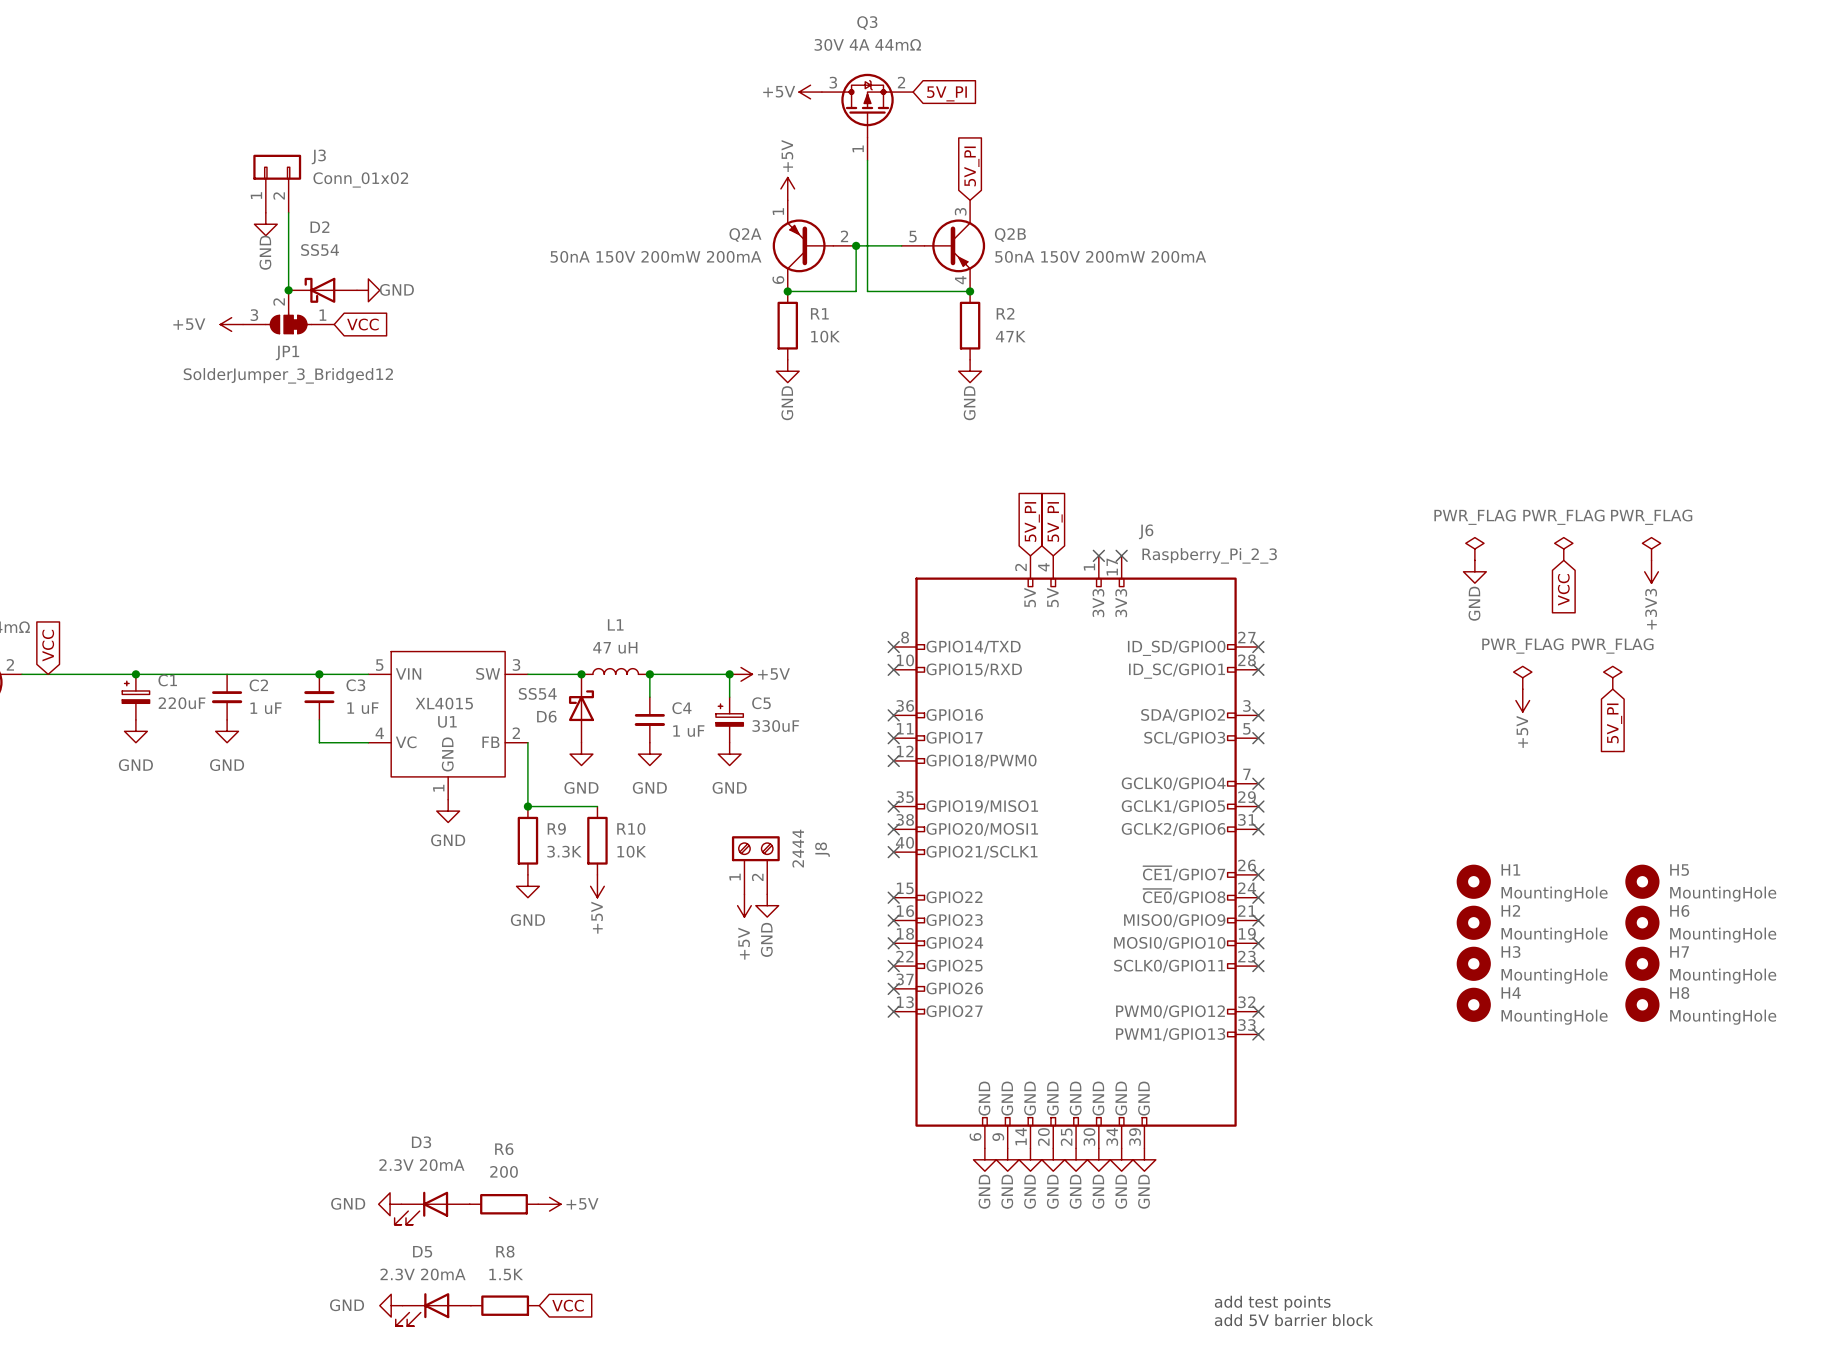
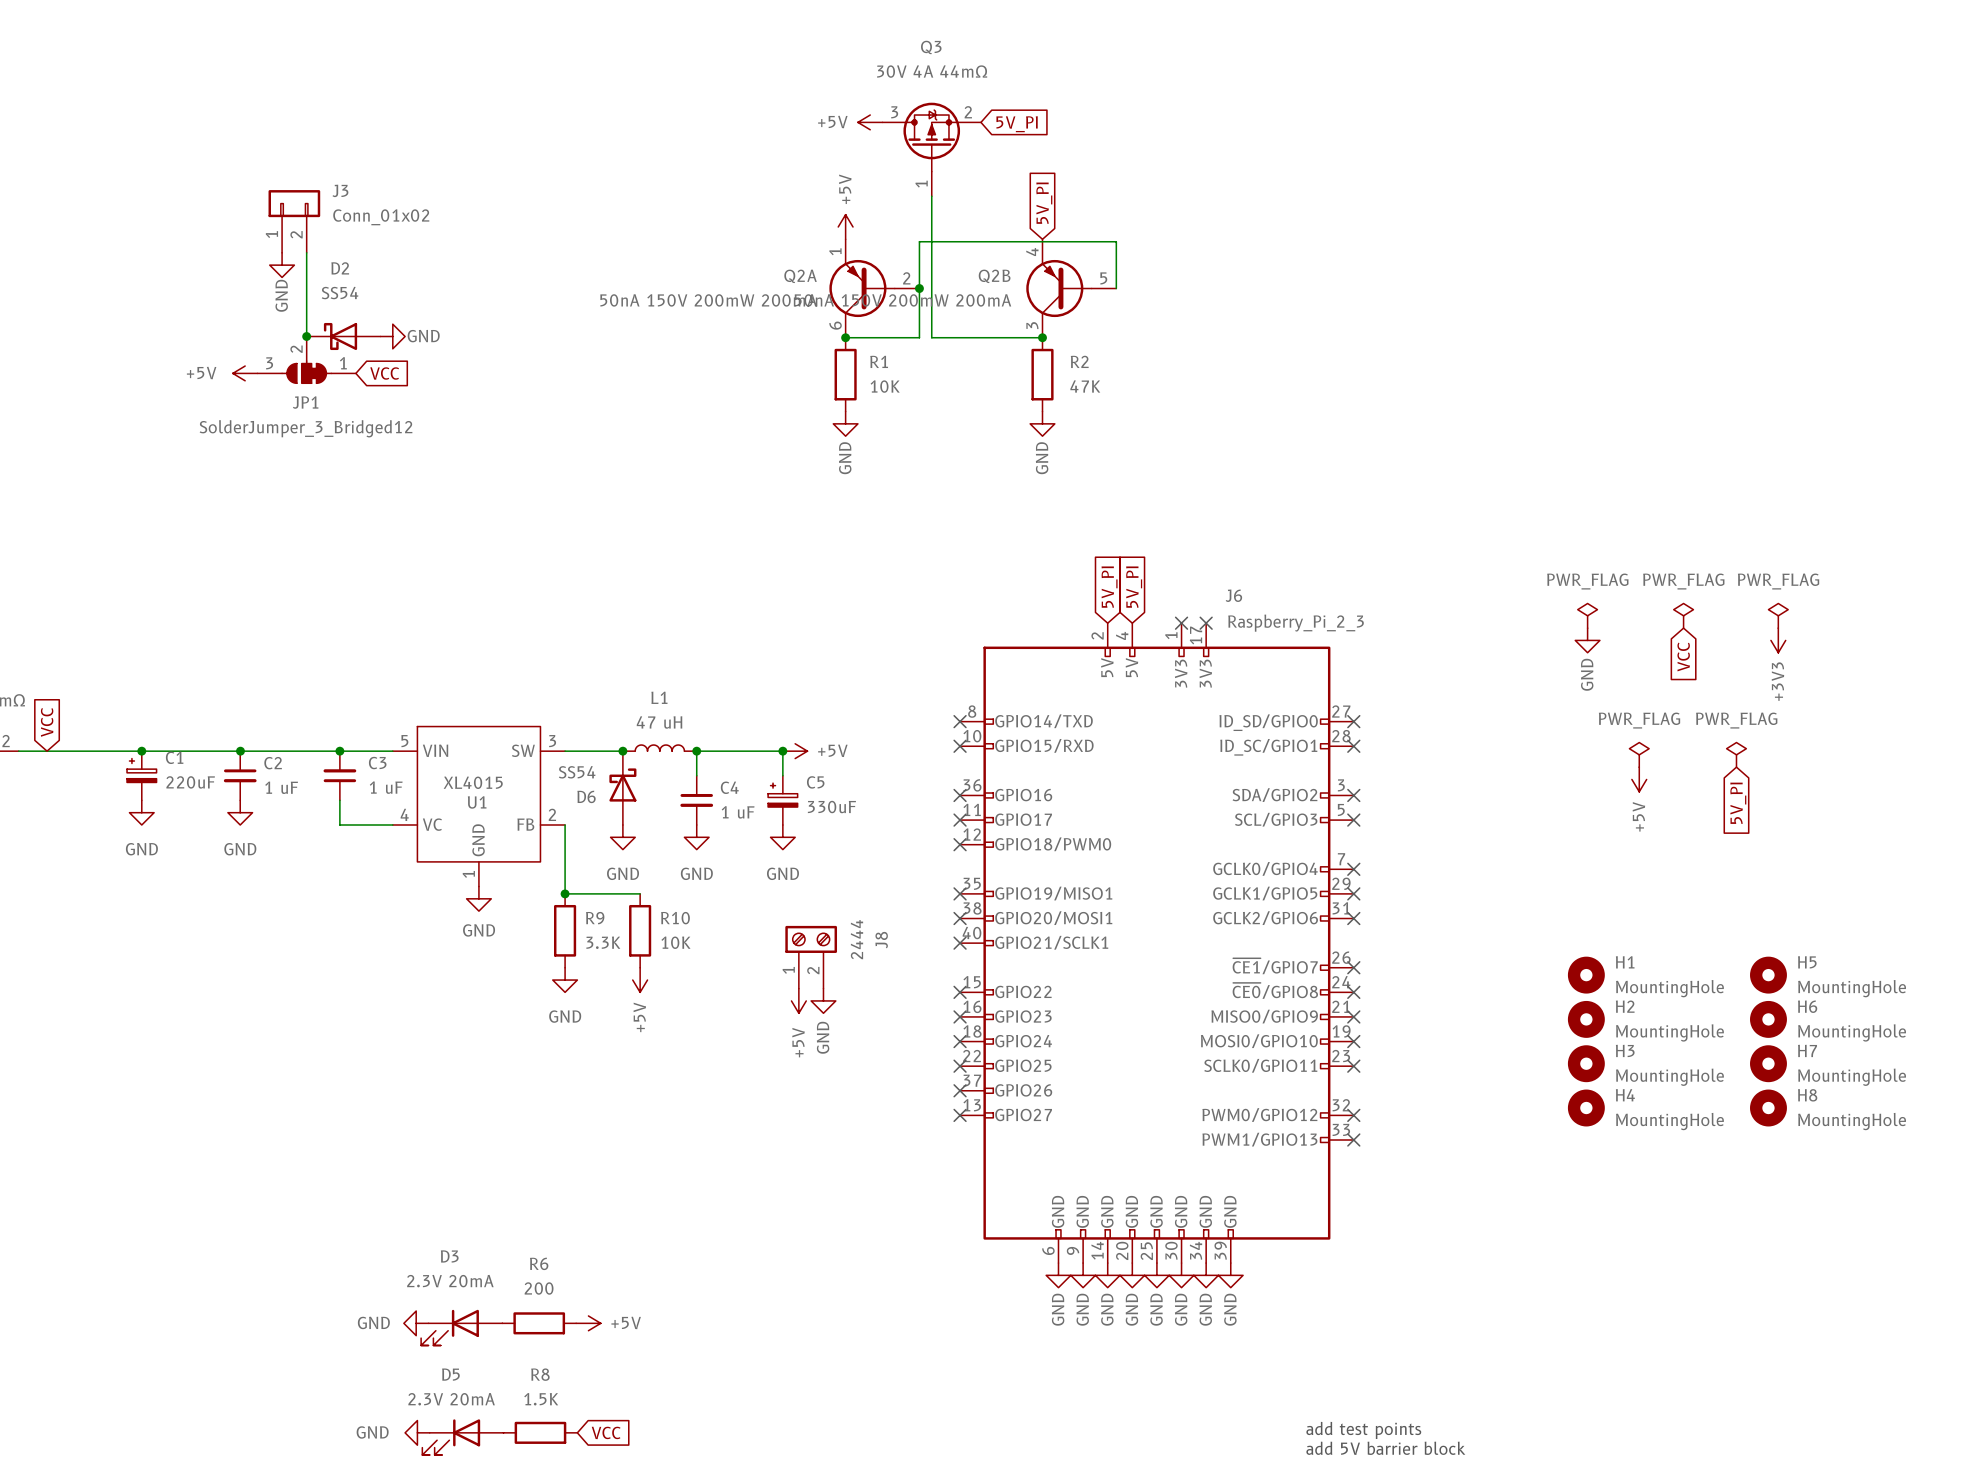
Q2B name position: Q2B (1010, 234) -> Q2B (994, 276)
wire: (856, 245) (901, 245) -> (919, 288) (919, 241) (1116, 241) (1116, 288)
Q2B rotation: 0° (954, 245) -> 180° (1058, 288)
Q2B value position: 50nA 150V 200mW 200mA (1100, 256) -> 50nA 150V 200mW 200mA (902, 300)
junction: none -> (240, 751)

